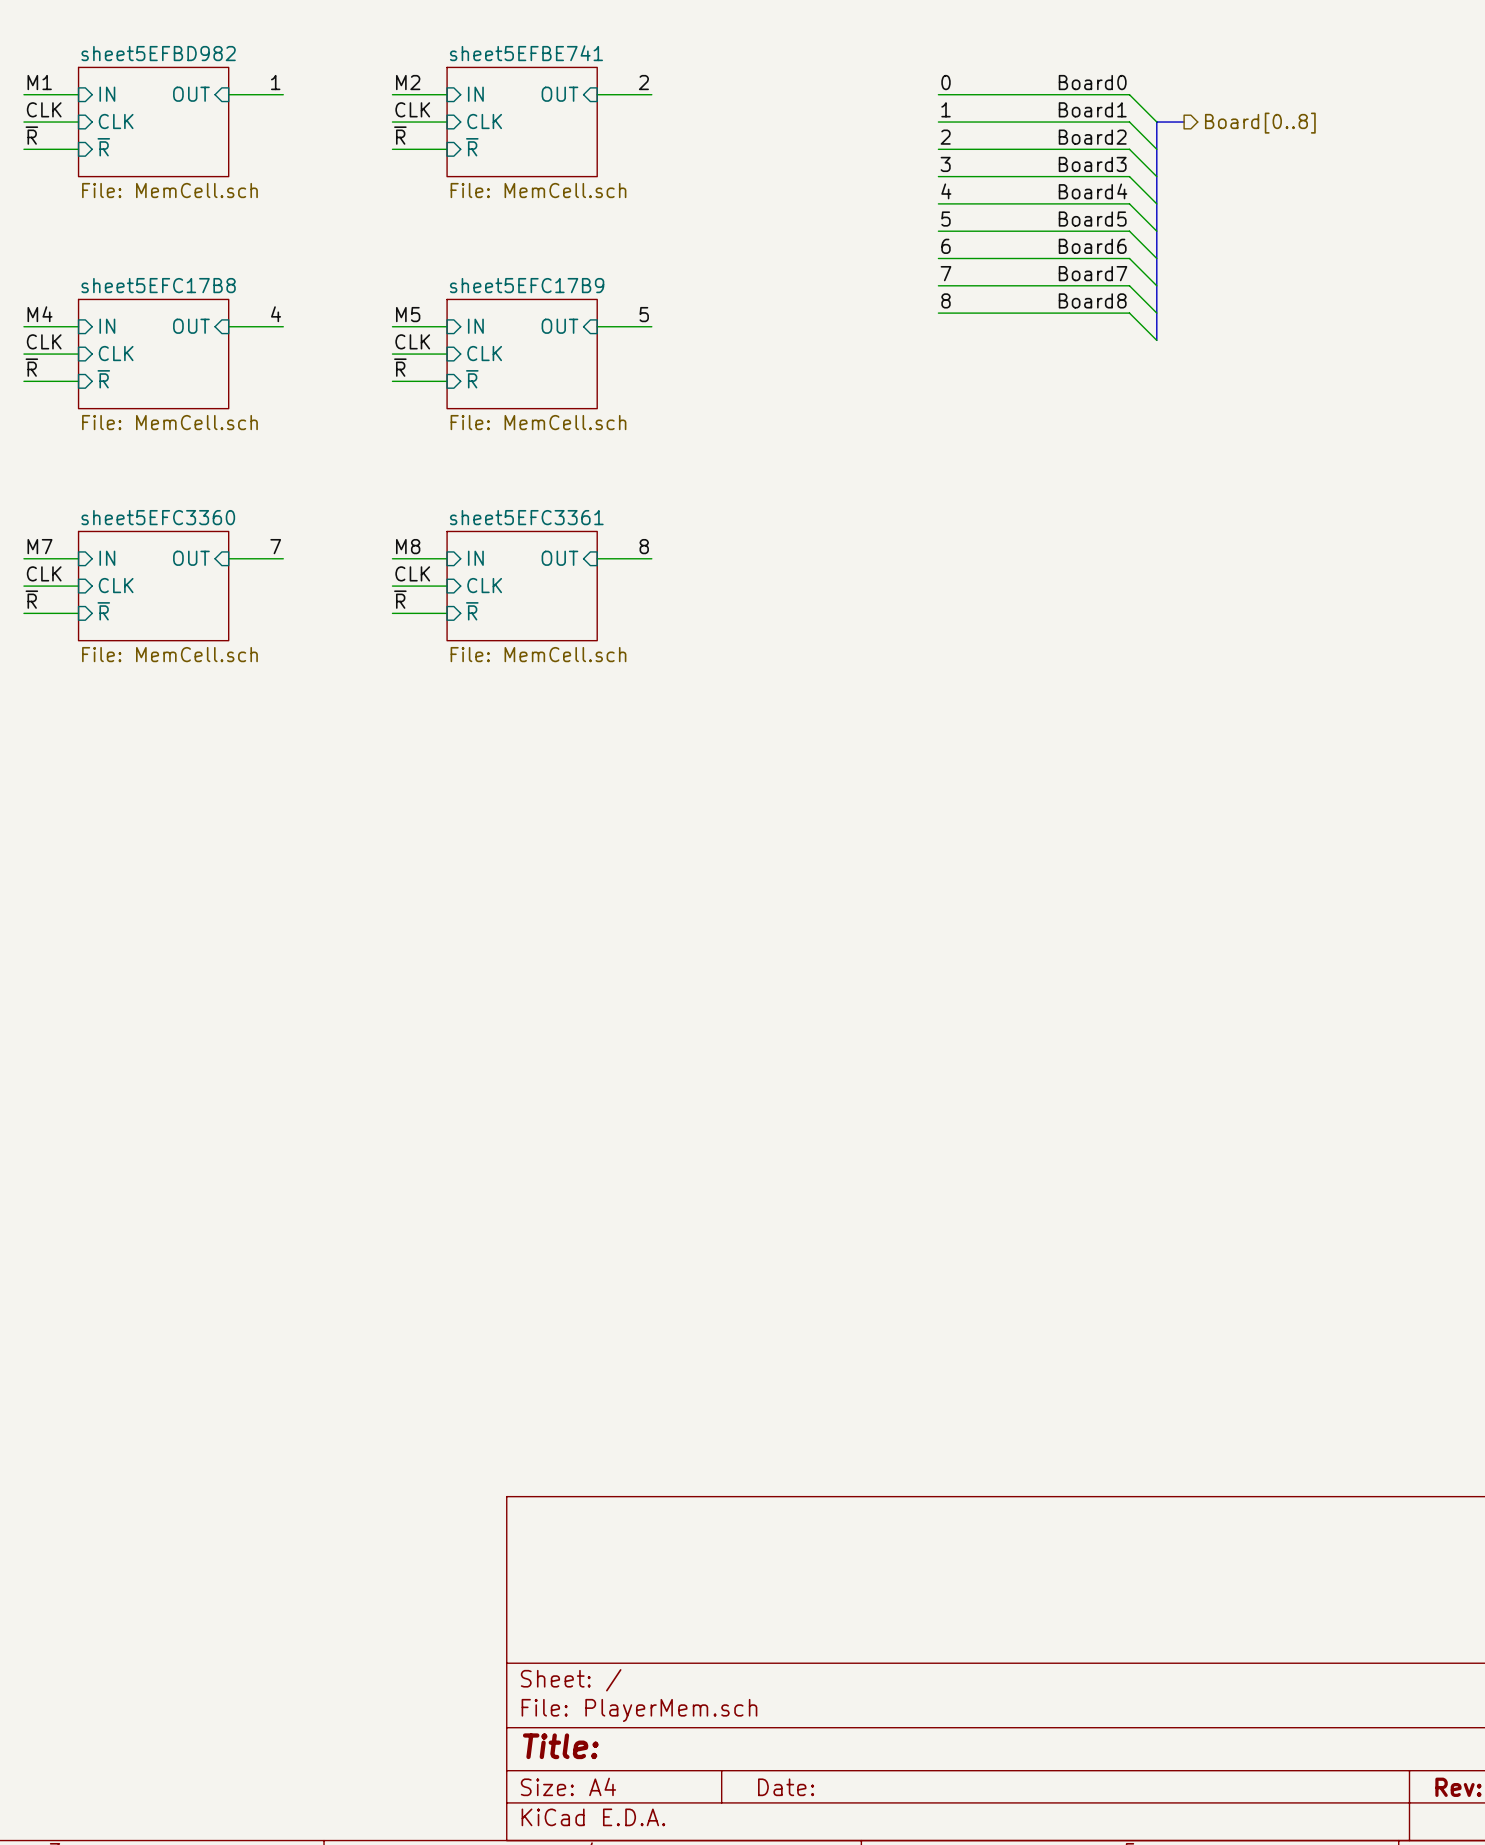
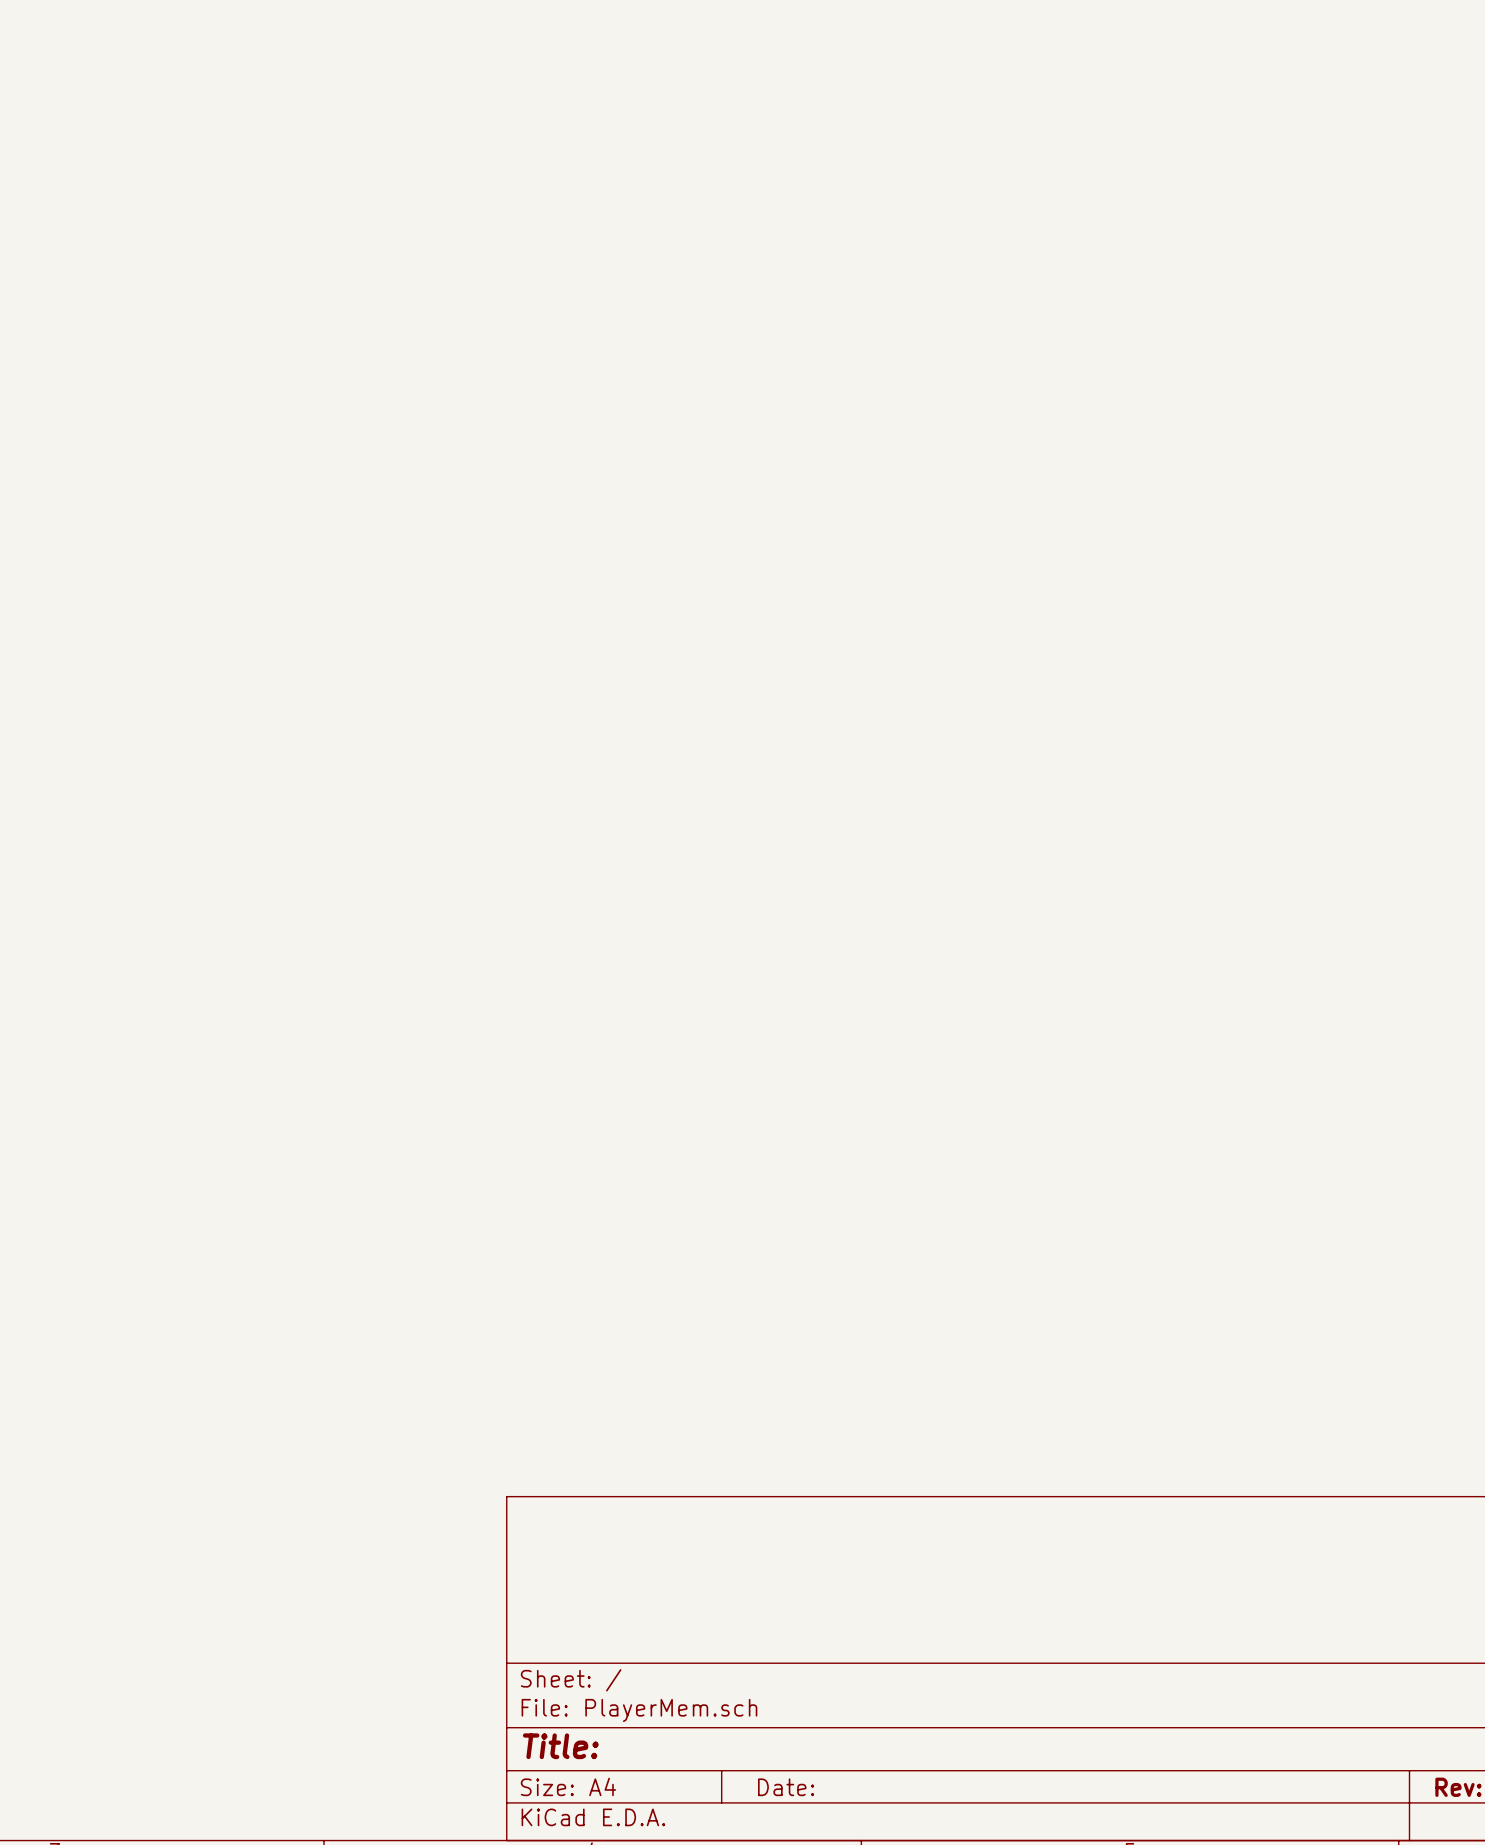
label: M1 (39, 82) -> none
label: 1 (275, 82) -> none
label: M2 (408, 82) -> none
label: 2 (643, 82) -> none
label: 0 (946, 82) -> none
label: Board0 (1092, 82) -> none
wire: (23, 94) (78, 94) -> none
sheet pin: IN (107, 94) -> none
sheet pin: OUT (191, 94) -> none
wire: (228, 94) (283, 94) -> none
wire: (392, 94) (447, 94) -> none
sheet pin: IN (475, 94) -> none
sheet pin: OUT (559, 94) -> none
wire: (597, 94) (651, 94) -> none
wire: (938, 94) (1129, 94) (1156, 122) -> none
label: CLK (44, 109) -> none
label: CLK (412, 109) -> none
label: 1 (946, 109) -> none
label: Board1 (1092, 109) -> none
sheet pin: CLK (116, 121) -> none
sheet pin: CLK (484, 121) -> none
wire: (23, 122) (78, 122) -> none
sheet sheet5EFBD982: File: MemCell.sch (153, 122) -> none
wire: (392, 122) (447, 122) -> none
sheet sheet5EFBE741: File: MemCell.sch (522, 122) -> none
wire: (938, 122) (1129, 122) (1156, 149) -> none
bus: (1184, 122) (1156, 122) (1156, 340) -> none
hierarchical label: Board[0..8] (1260, 123) -> none
label: ~{R} (31, 135) -> none
label: ~{R} (400, 135) -> none
label: 2 (945, 137) -> none
label: Board2 (1092, 137) -> none
sheet pin: ~{R} (103, 147) -> none
sheet pin: ~{R} (472, 147) -> none
wire: (23, 149) (78, 149) -> none
wire: (392, 149) (447, 149) -> none
wire: (938, 149) (1129, 149) (1156, 176) -> none
label: 3 (945, 164) -> none
label: Board3 (1092, 164) -> none
wire: (938, 176) (1129, 176) (1156, 203) -> none
label: 4 (946, 191) -> none
label: Board4 (1093, 191) -> none
wire: (938, 203) (1129, 203) (1156, 231) -> none
label: 5 (946, 219) -> none
label: Board5 (1092, 219) -> none
wire: (938, 231) (1129, 231) (1156, 258) -> none
label: 6 (946, 246) -> none
label: Board6 (1092, 246) -> none
wire: (938, 258) (1129, 258) (1156, 285) -> none
label: 7 (946, 273) -> none
label: Board7 (1093, 273) -> none
wire: (938, 285) (1129, 285) (1156, 313) -> none
label: 8 (946, 300) -> none
label: Board8 (1092, 300) -> none
wire: (938, 313) (1129, 313) (1156, 340) -> none
label: M4 (39, 314) -> none
label: 4 (276, 314) -> none
label: M5 (408, 314) -> none
label: 5 (644, 314) -> none
wire: (23, 326) (78, 326) -> none
sheet pin: IN (107, 326) -> none
sheet pin: OUT (191, 326) -> none
wire: (228, 326) (283, 326) -> none
wire: (392, 326) (447, 326) -> none
sheet pin: IN (475, 326) -> none
sheet pin: OUT (559, 326) -> none
wire: (597, 326) (651, 326) -> none
label: CLK (44, 341) -> none
label: CLK (412, 341) -> none
sheet pin: CLK (116, 353) -> none
sheet pin: CLK (484, 353) -> none
wire: (23, 354) (78, 354) -> none
sheet sheet5EFC17B8: File: MemCell.sch (153, 354) -> none
wire: (392, 354) (447, 354) -> none
sheet sheet5EFC17B9: File: MemCell.sch (522, 354) -> none
label: ~{R} (31, 367) -> none
label: ~{R} (400, 367) -> none
sheet pin: ~{R} (103, 379) -> none
sheet pin: ~{R} (472, 379) -> none
wire: (23, 381) (78, 381) -> none
wire: (392, 381) (447, 381) -> none
label: M7 (39, 546) -> none
label: 7 (275, 546) -> none
label: M8 (408, 546) -> none
label: 8 (644, 546) -> none
wire: (23, 558) (78, 558) -> none
sheet pin: IN (107, 558) -> none
sheet pin: OUT (191, 558) -> none
wire: (228, 558) (283, 558) -> none
wire: (392, 558) (447, 558) -> none
sheet pin: IN (475, 558) -> none
sheet pin: OUT (559, 558) -> none
wire: (597, 558) (651, 558) -> none
label: CLK (44, 573) -> none
label: CLK (412, 573) -> none
sheet pin: CLK (116, 585) -> none
sheet pin: CLK (484, 585) -> none
wire: (23, 586) (78, 586) -> none
sheet sheet5EFC3360: File: MemCell.sch (153, 586) -> none
wire: (392, 586) (447, 586) -> none
sheet sheet5EFC3361: File: MemCell.sch (522, 586) -> none
label: ~{R} (31, 599) -> none
label: ~{R} (400, 599) -> none
sheet pin: ~{R} (103, 611) -> none
sheet pin: ~{R} (472, 611) -> none
wire: (23, 613) (78, 613) -> none
wire: (392, 613) (447, 613) -> none

